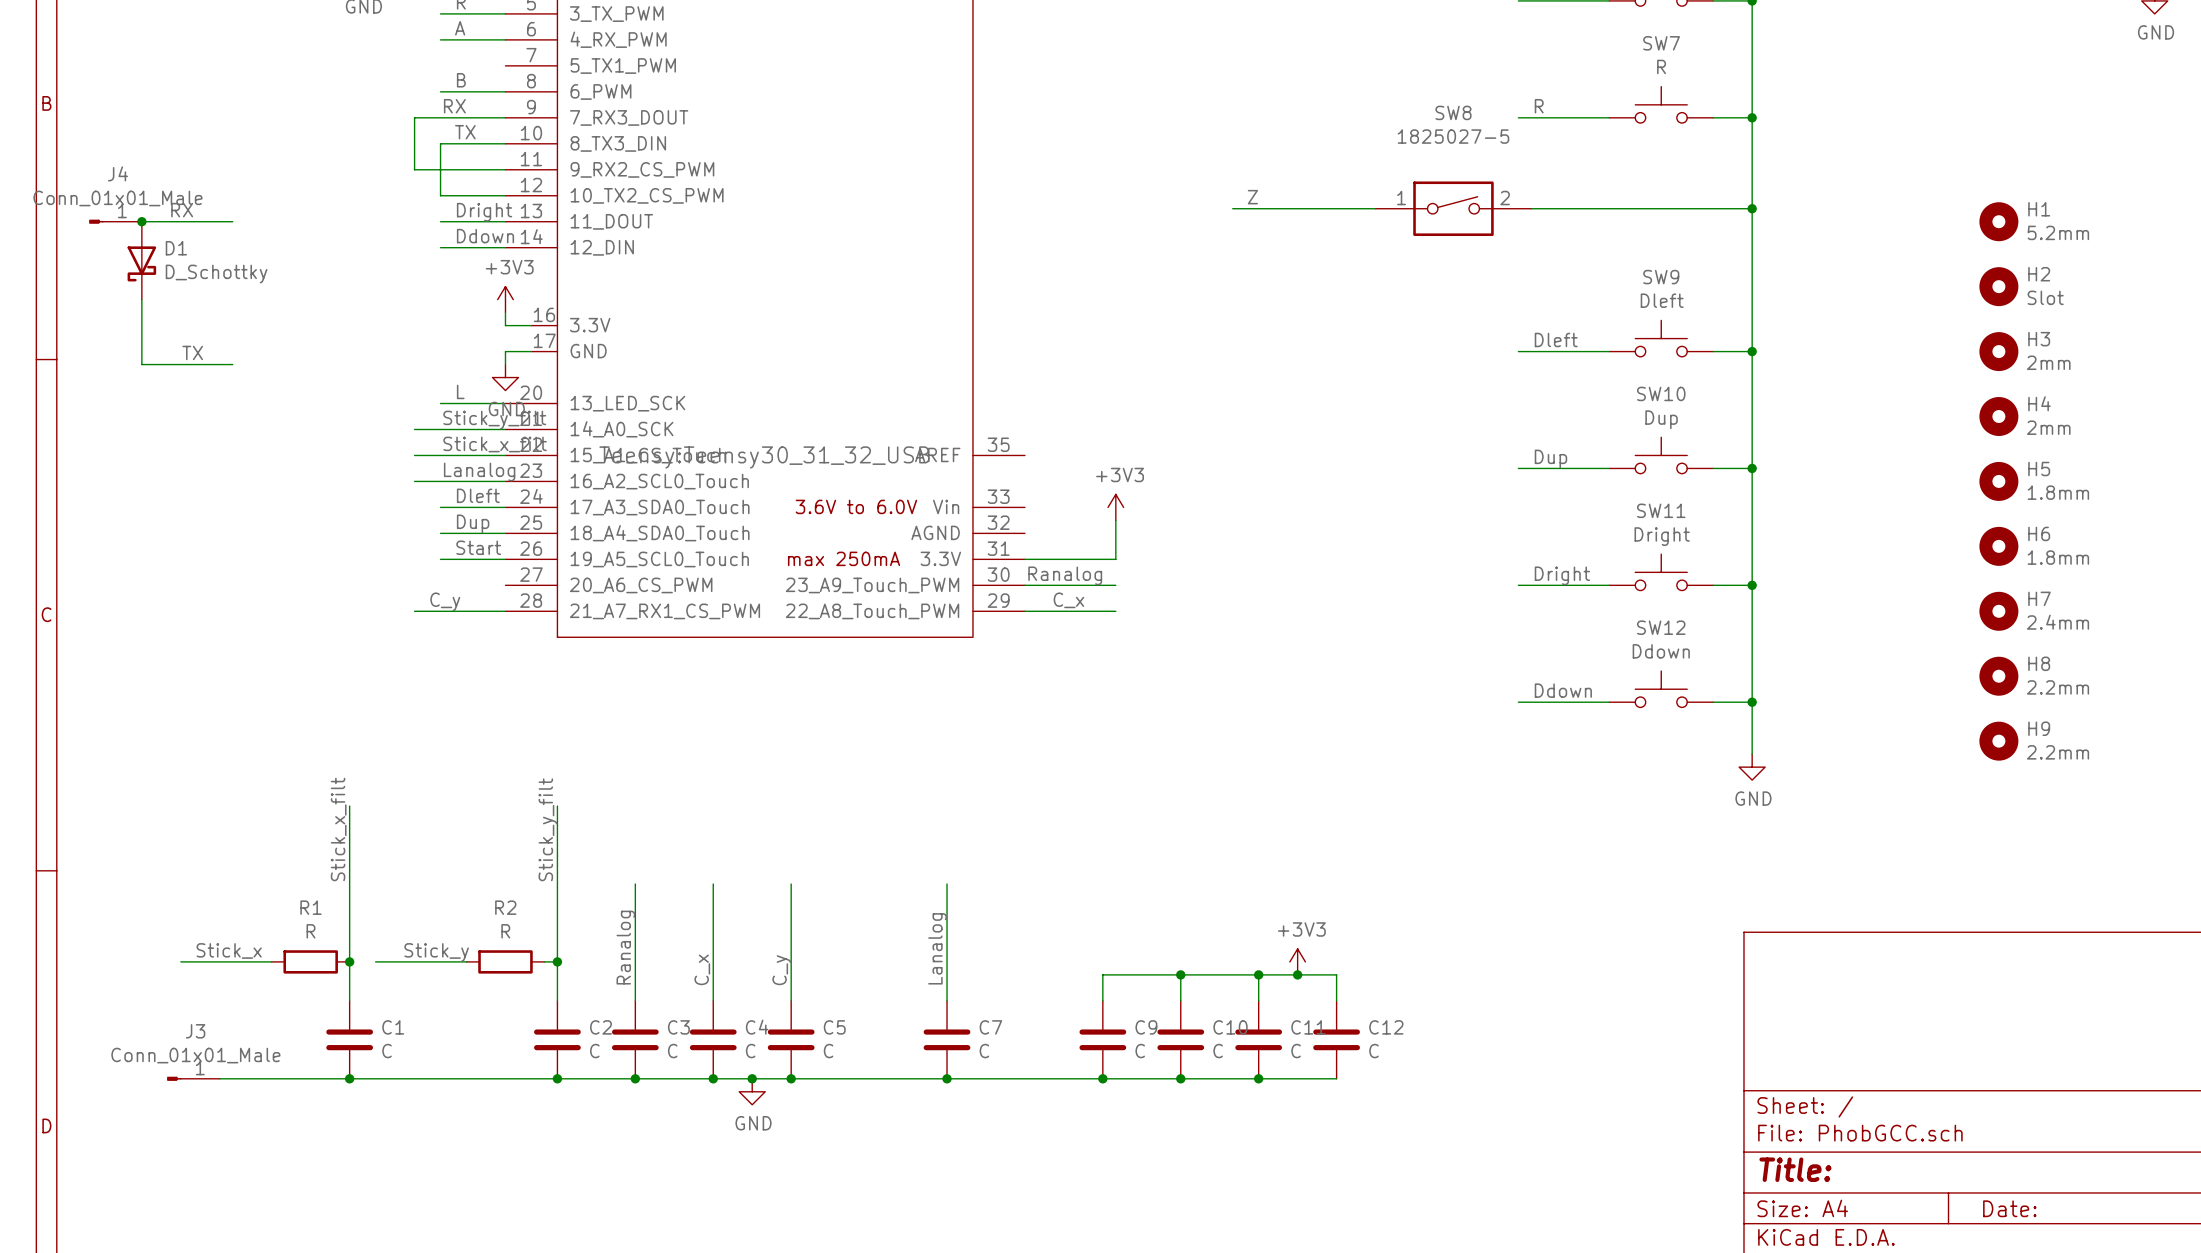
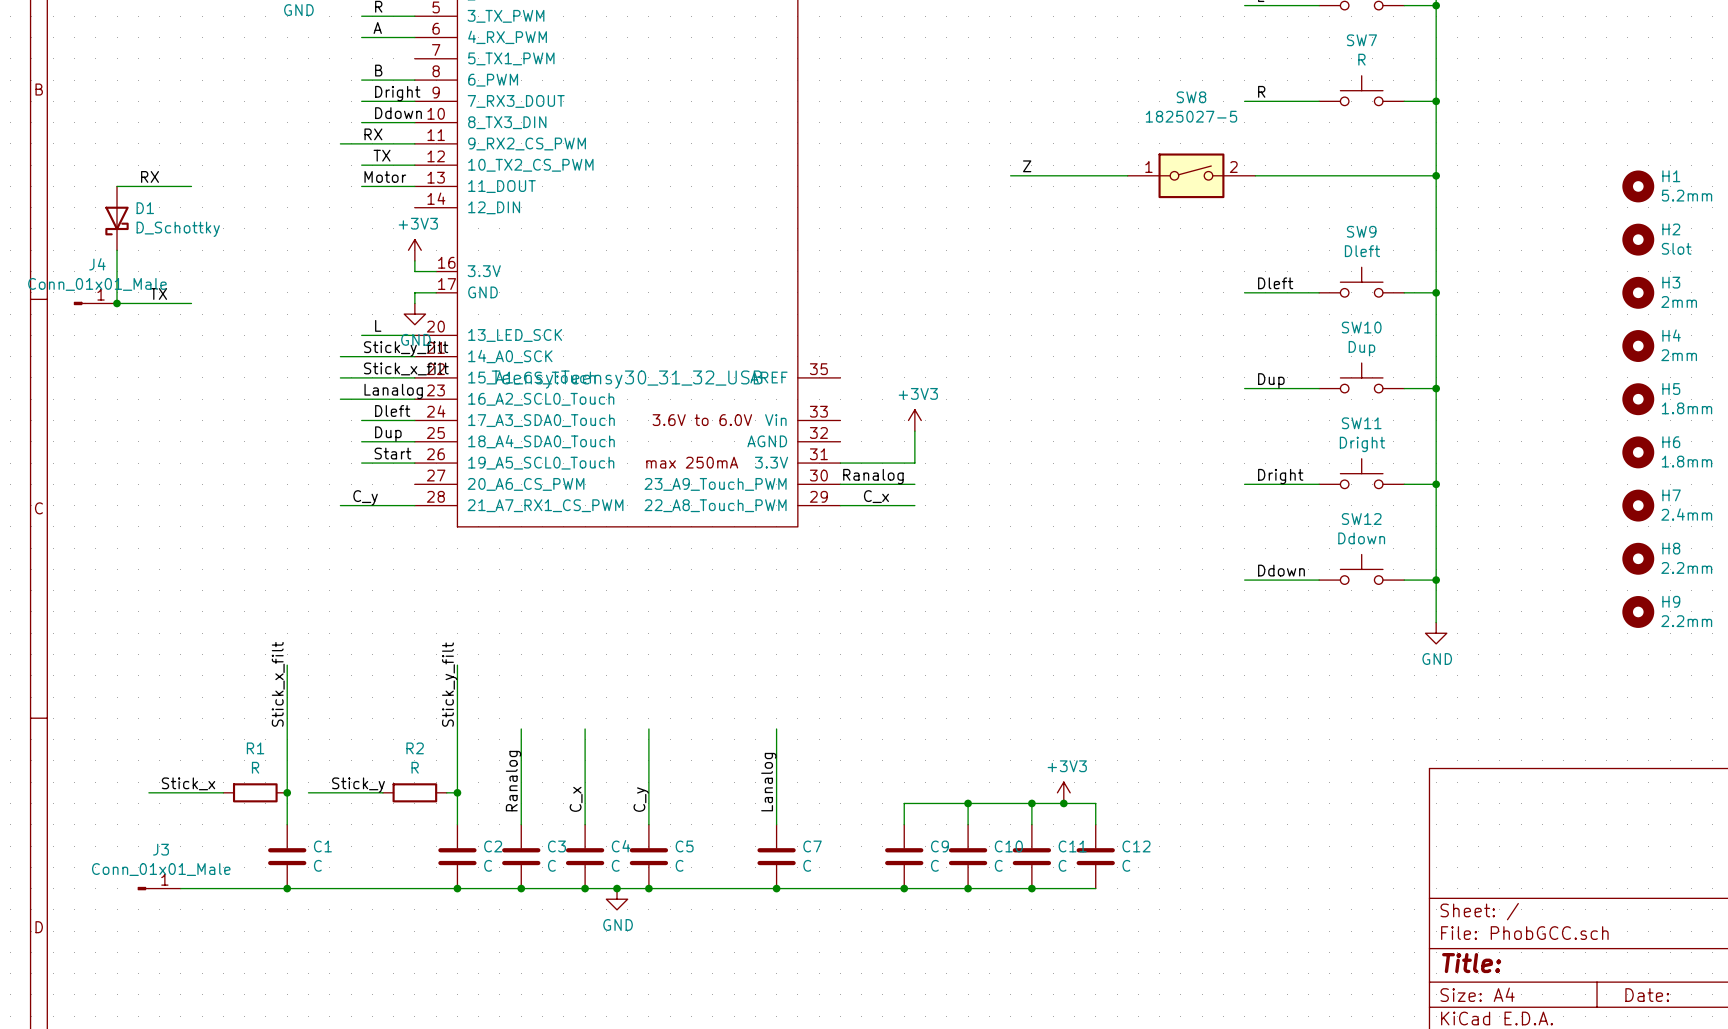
label position: RX (454, 106) -> RX (373, 134)
wire: (440, 117) (414, 117) (414, 169) -> none
label: TX (465, 132) -> Ddown (398, 113)
wire: (440, 143) (440, 195) -> none
label: none -> TX (382, 155)
label: none -> Motor (385, 176)
label position: Dright (484, 212) -> Dright (397, 93)
J4 position: (115, 221) -> (95, 303)
junction: (141, 221) -> none
label: Ddown (485, 236) -> none
wire: (440, 247) (505, 247) -> none
junction: none -> (117, 303)

